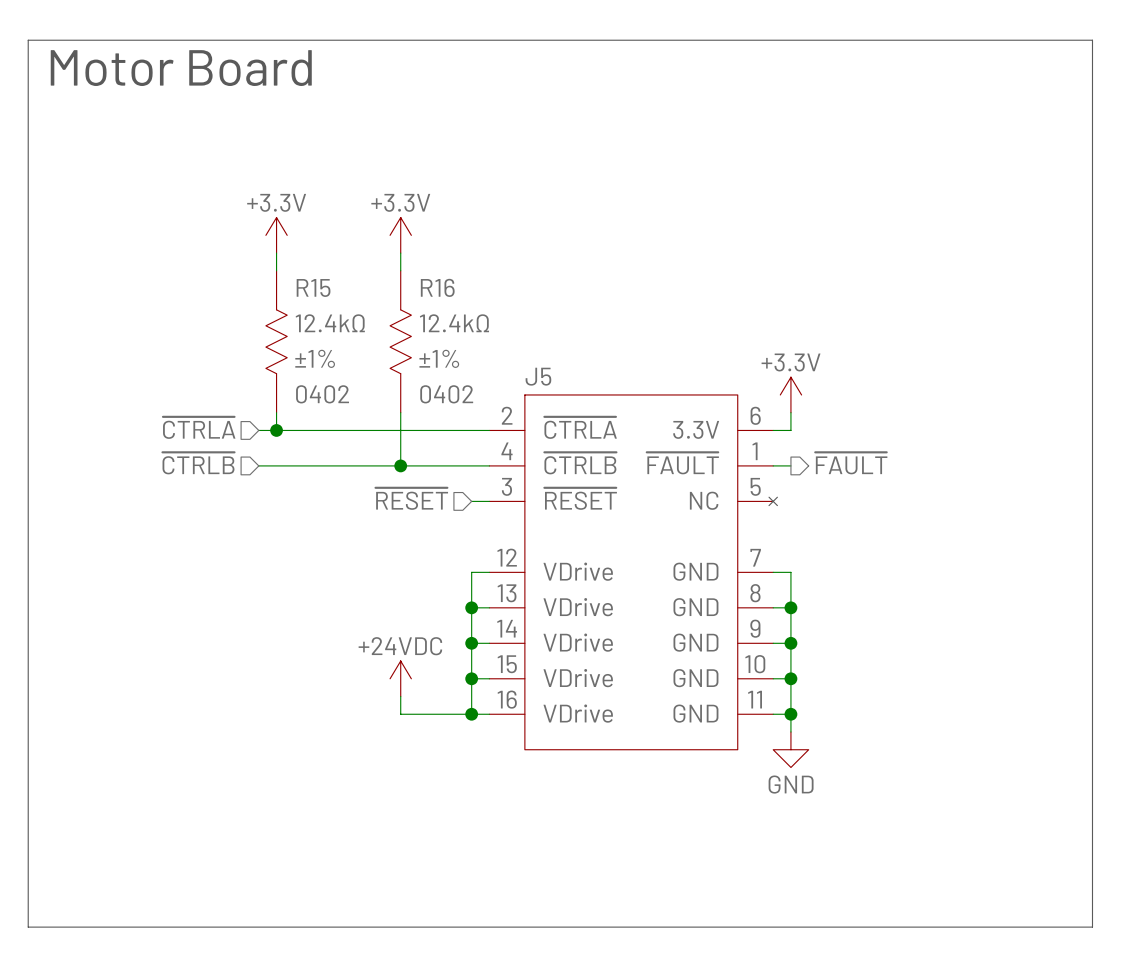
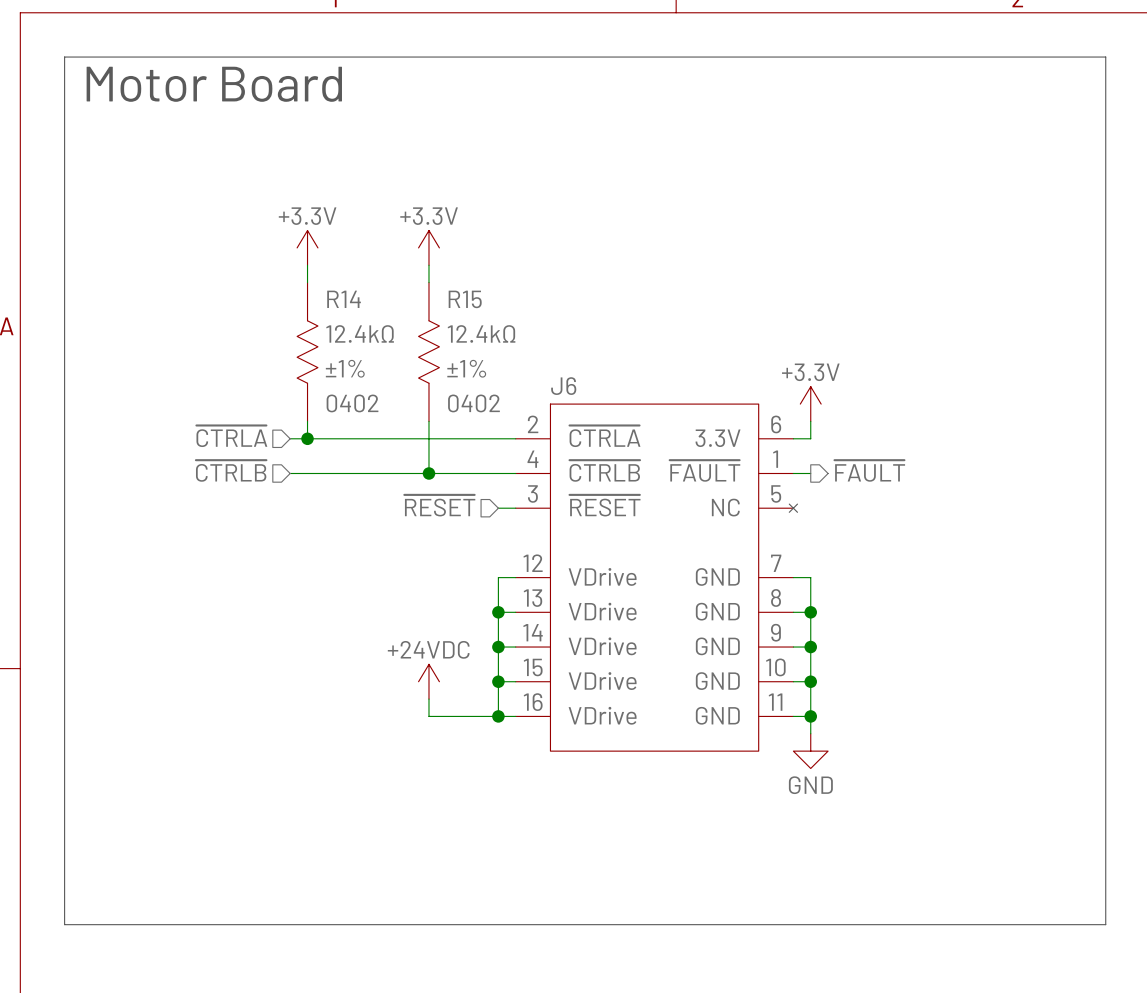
R15 name: R15 (313, 287) -> R14 (344, 299)
R16 name: R16 (437, 287) -> R15 (465, 299)
J5 name: J5 (538, 376) -> J6 (563, 386)

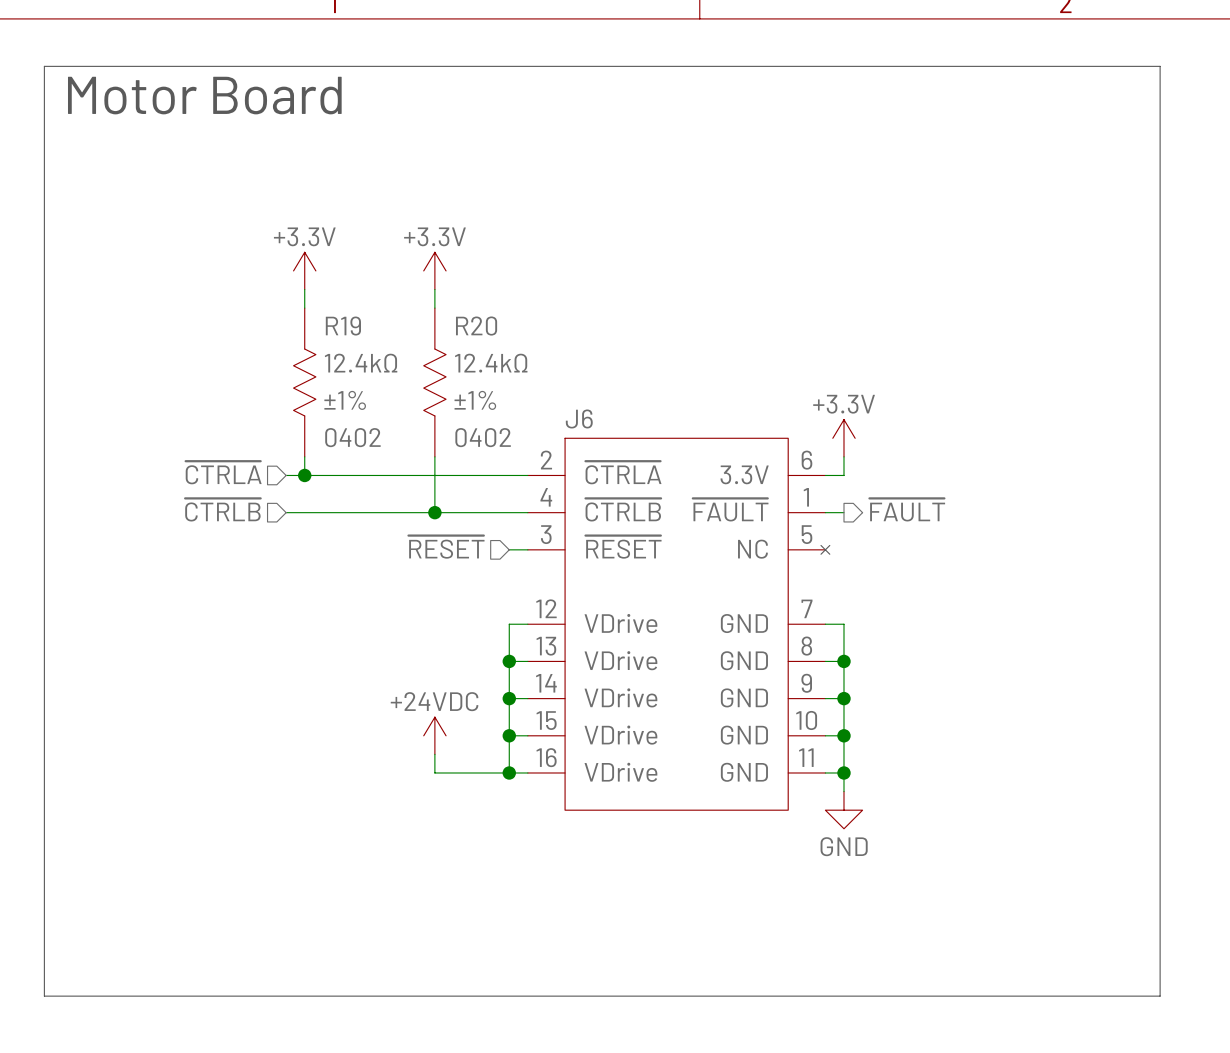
R14 name: R14 (344, 299) -> R19 (343, 326)
R15 name: R15 (465, 299) -> R20 (476, 326)

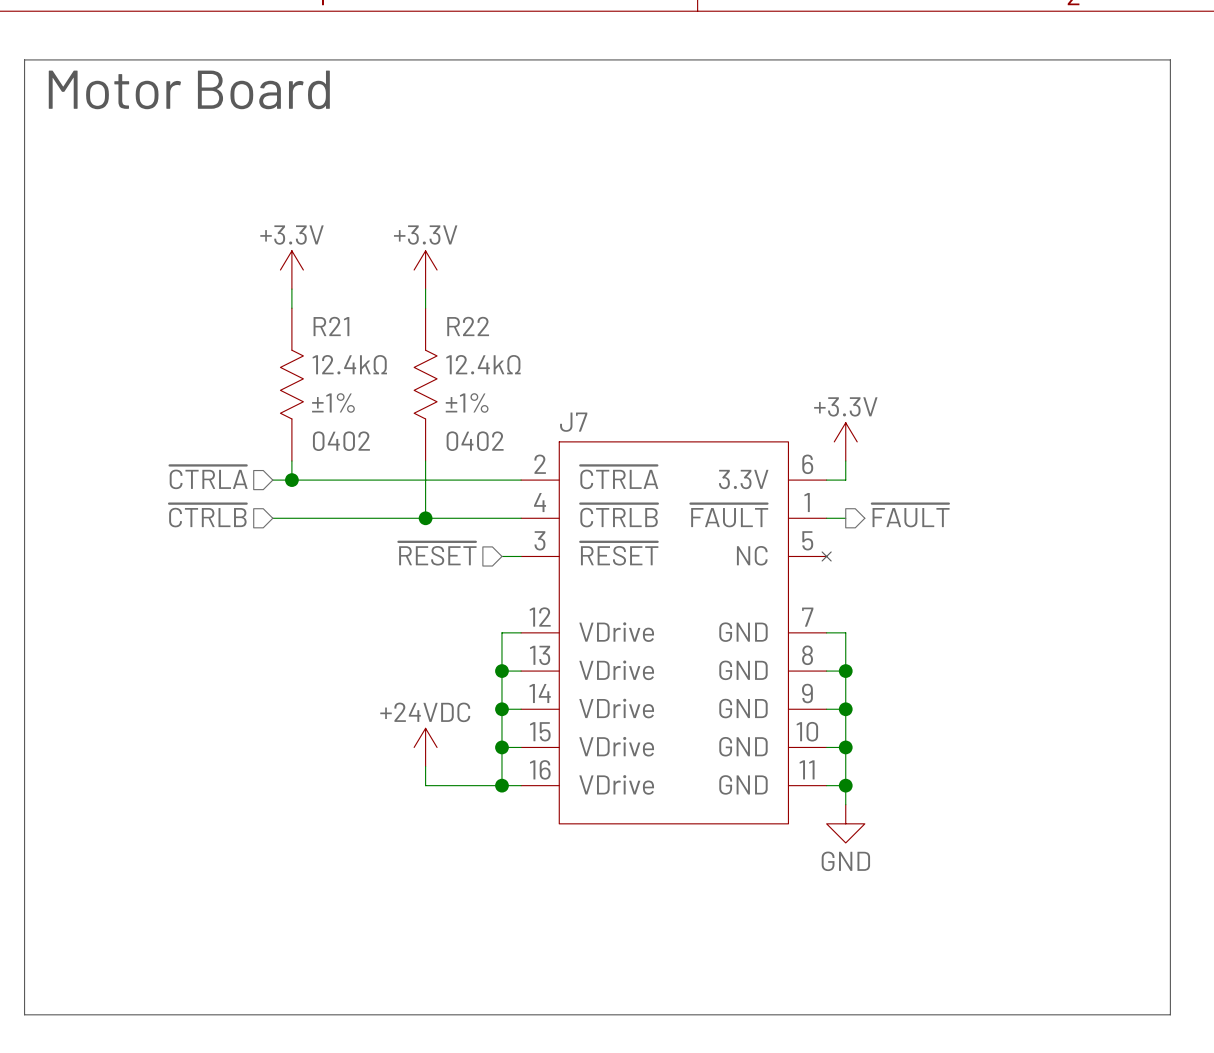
R19 name: R19 (343, 326) -> R21 (331, 326)
R20 name: R20 (476, 326) -> R22 (468, 326)
J6 name: J6 (579, 418) -> J7 (573, 422)

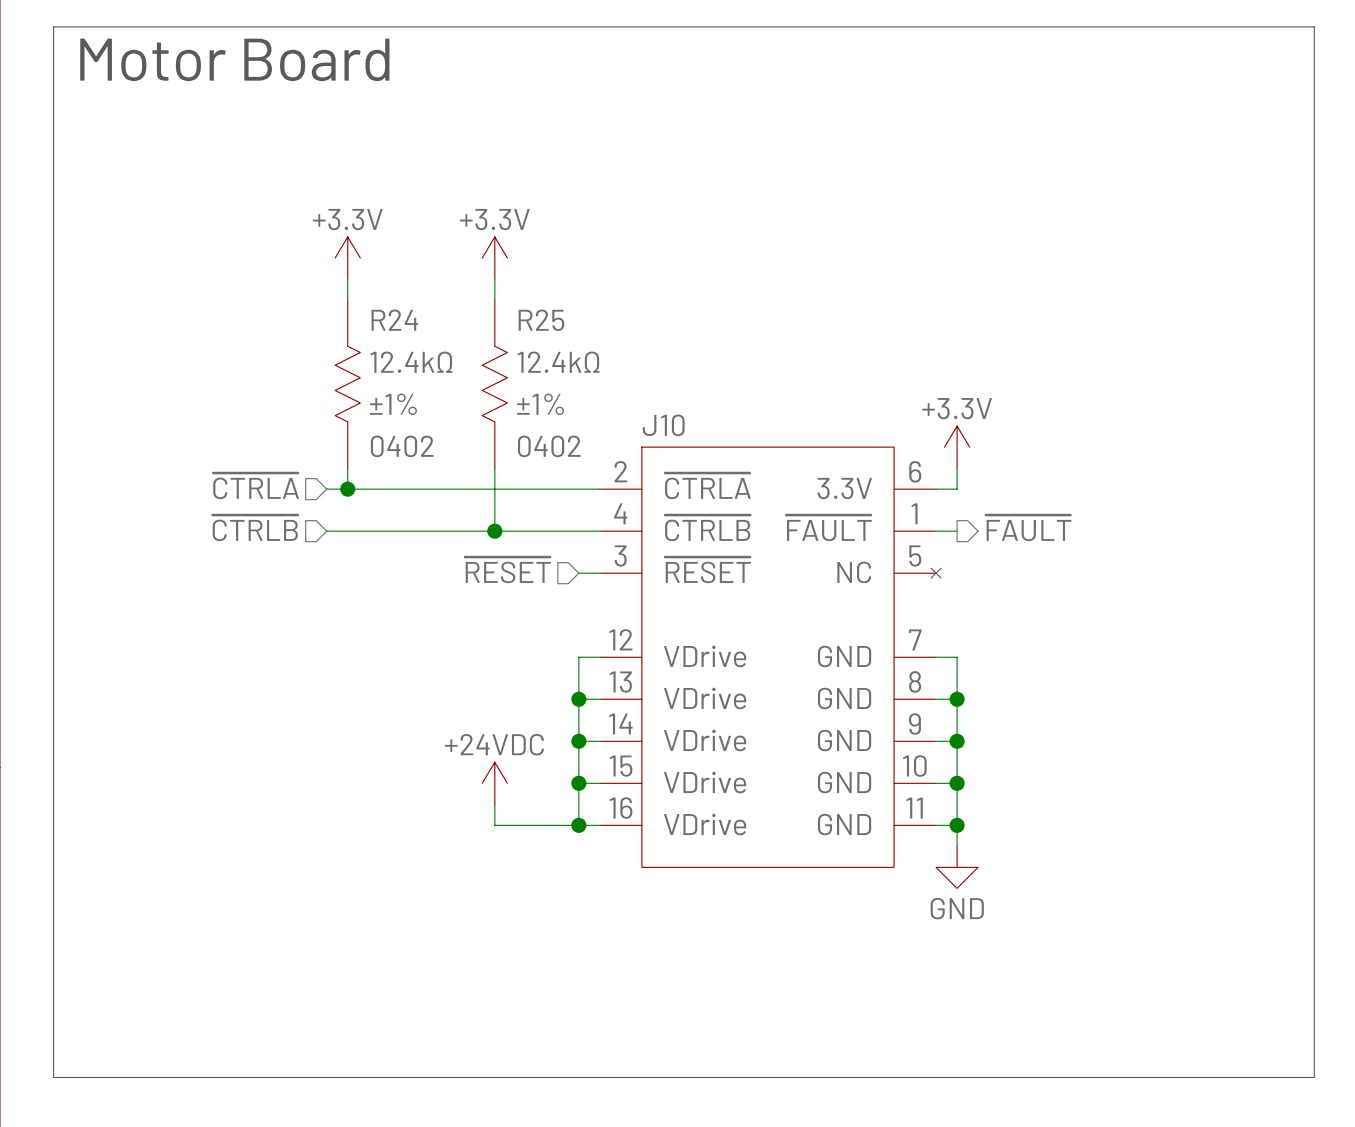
R21 name: R21 (331, 326) -> R24 (394, 320)
R22 name: R22 (468, 326) -> R25 (541, 320)
J7 name: J7 (573, 422) -> J10 (663, 425)

